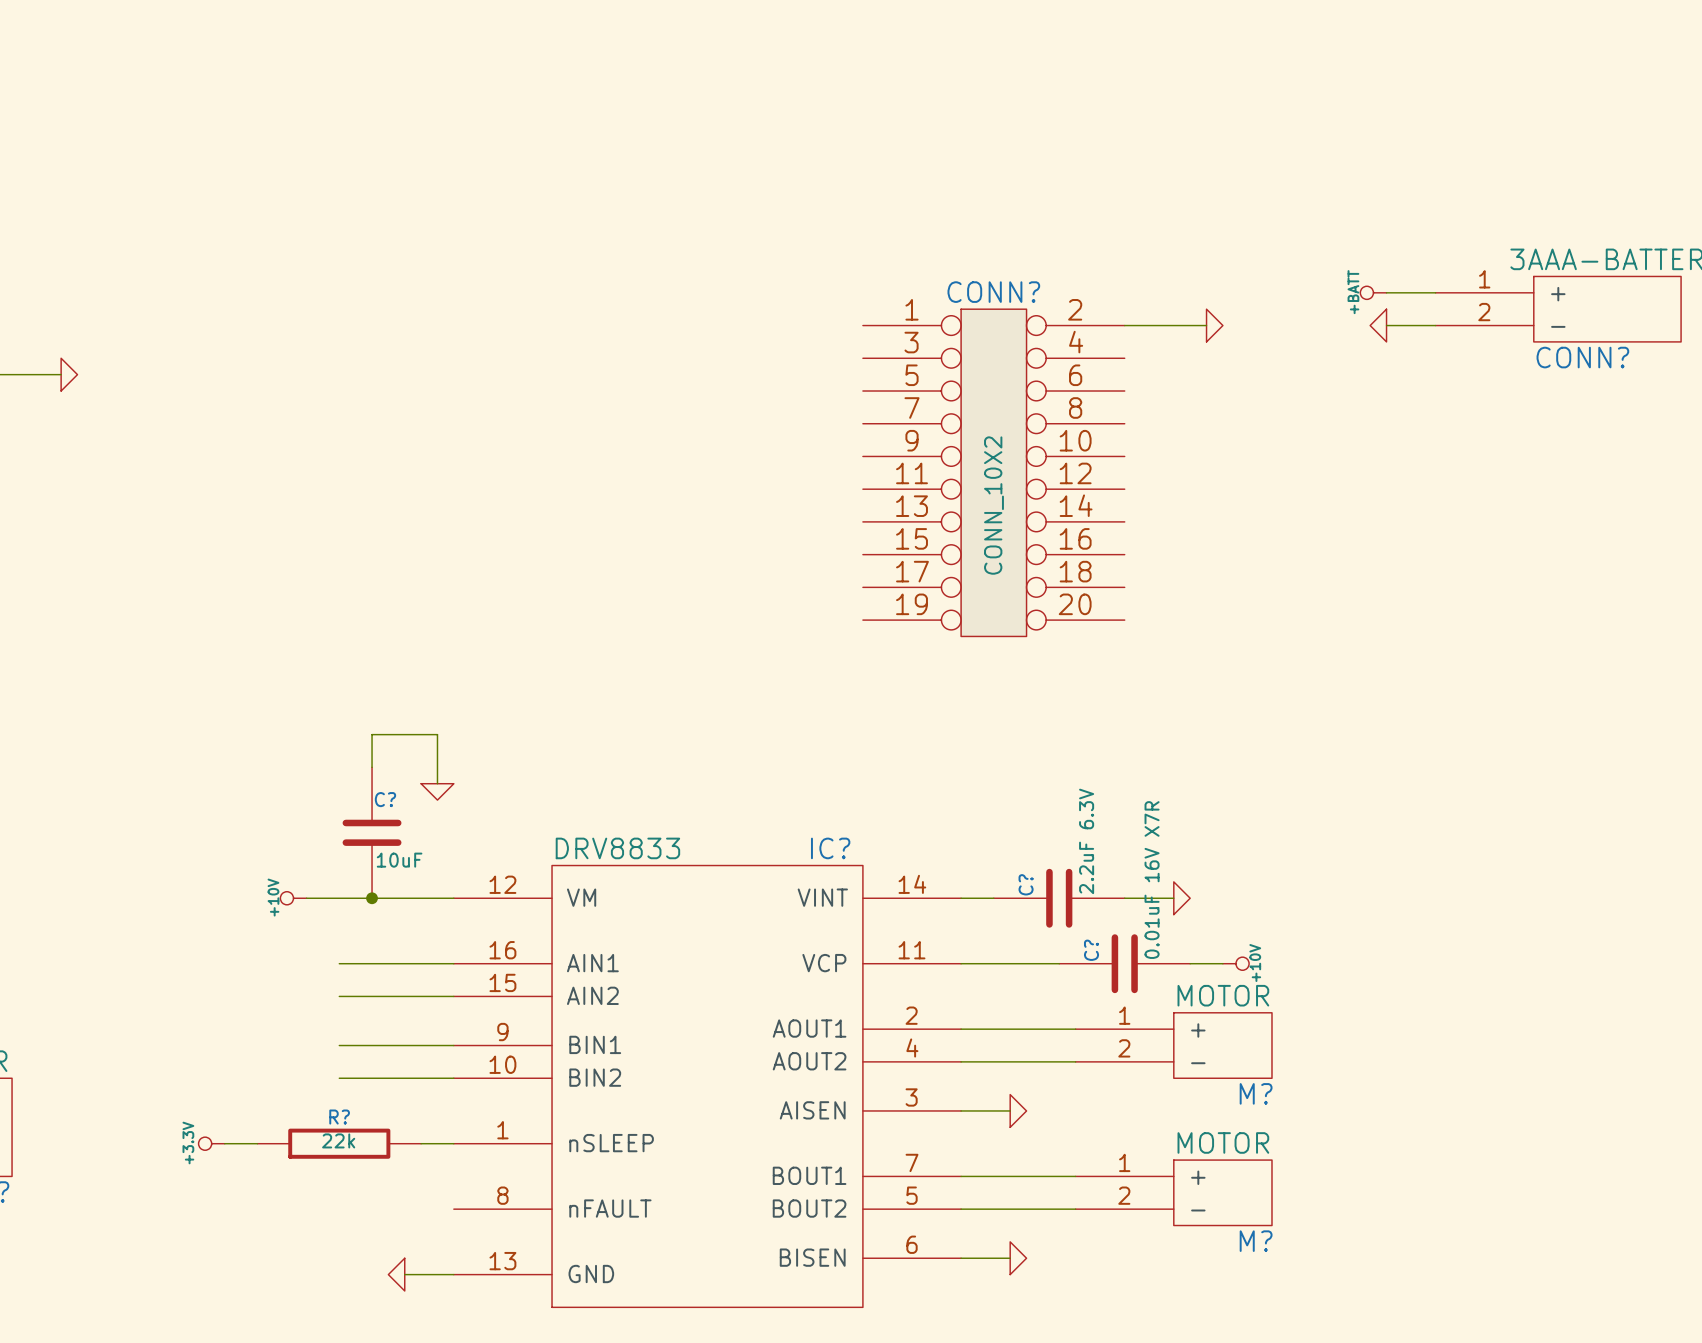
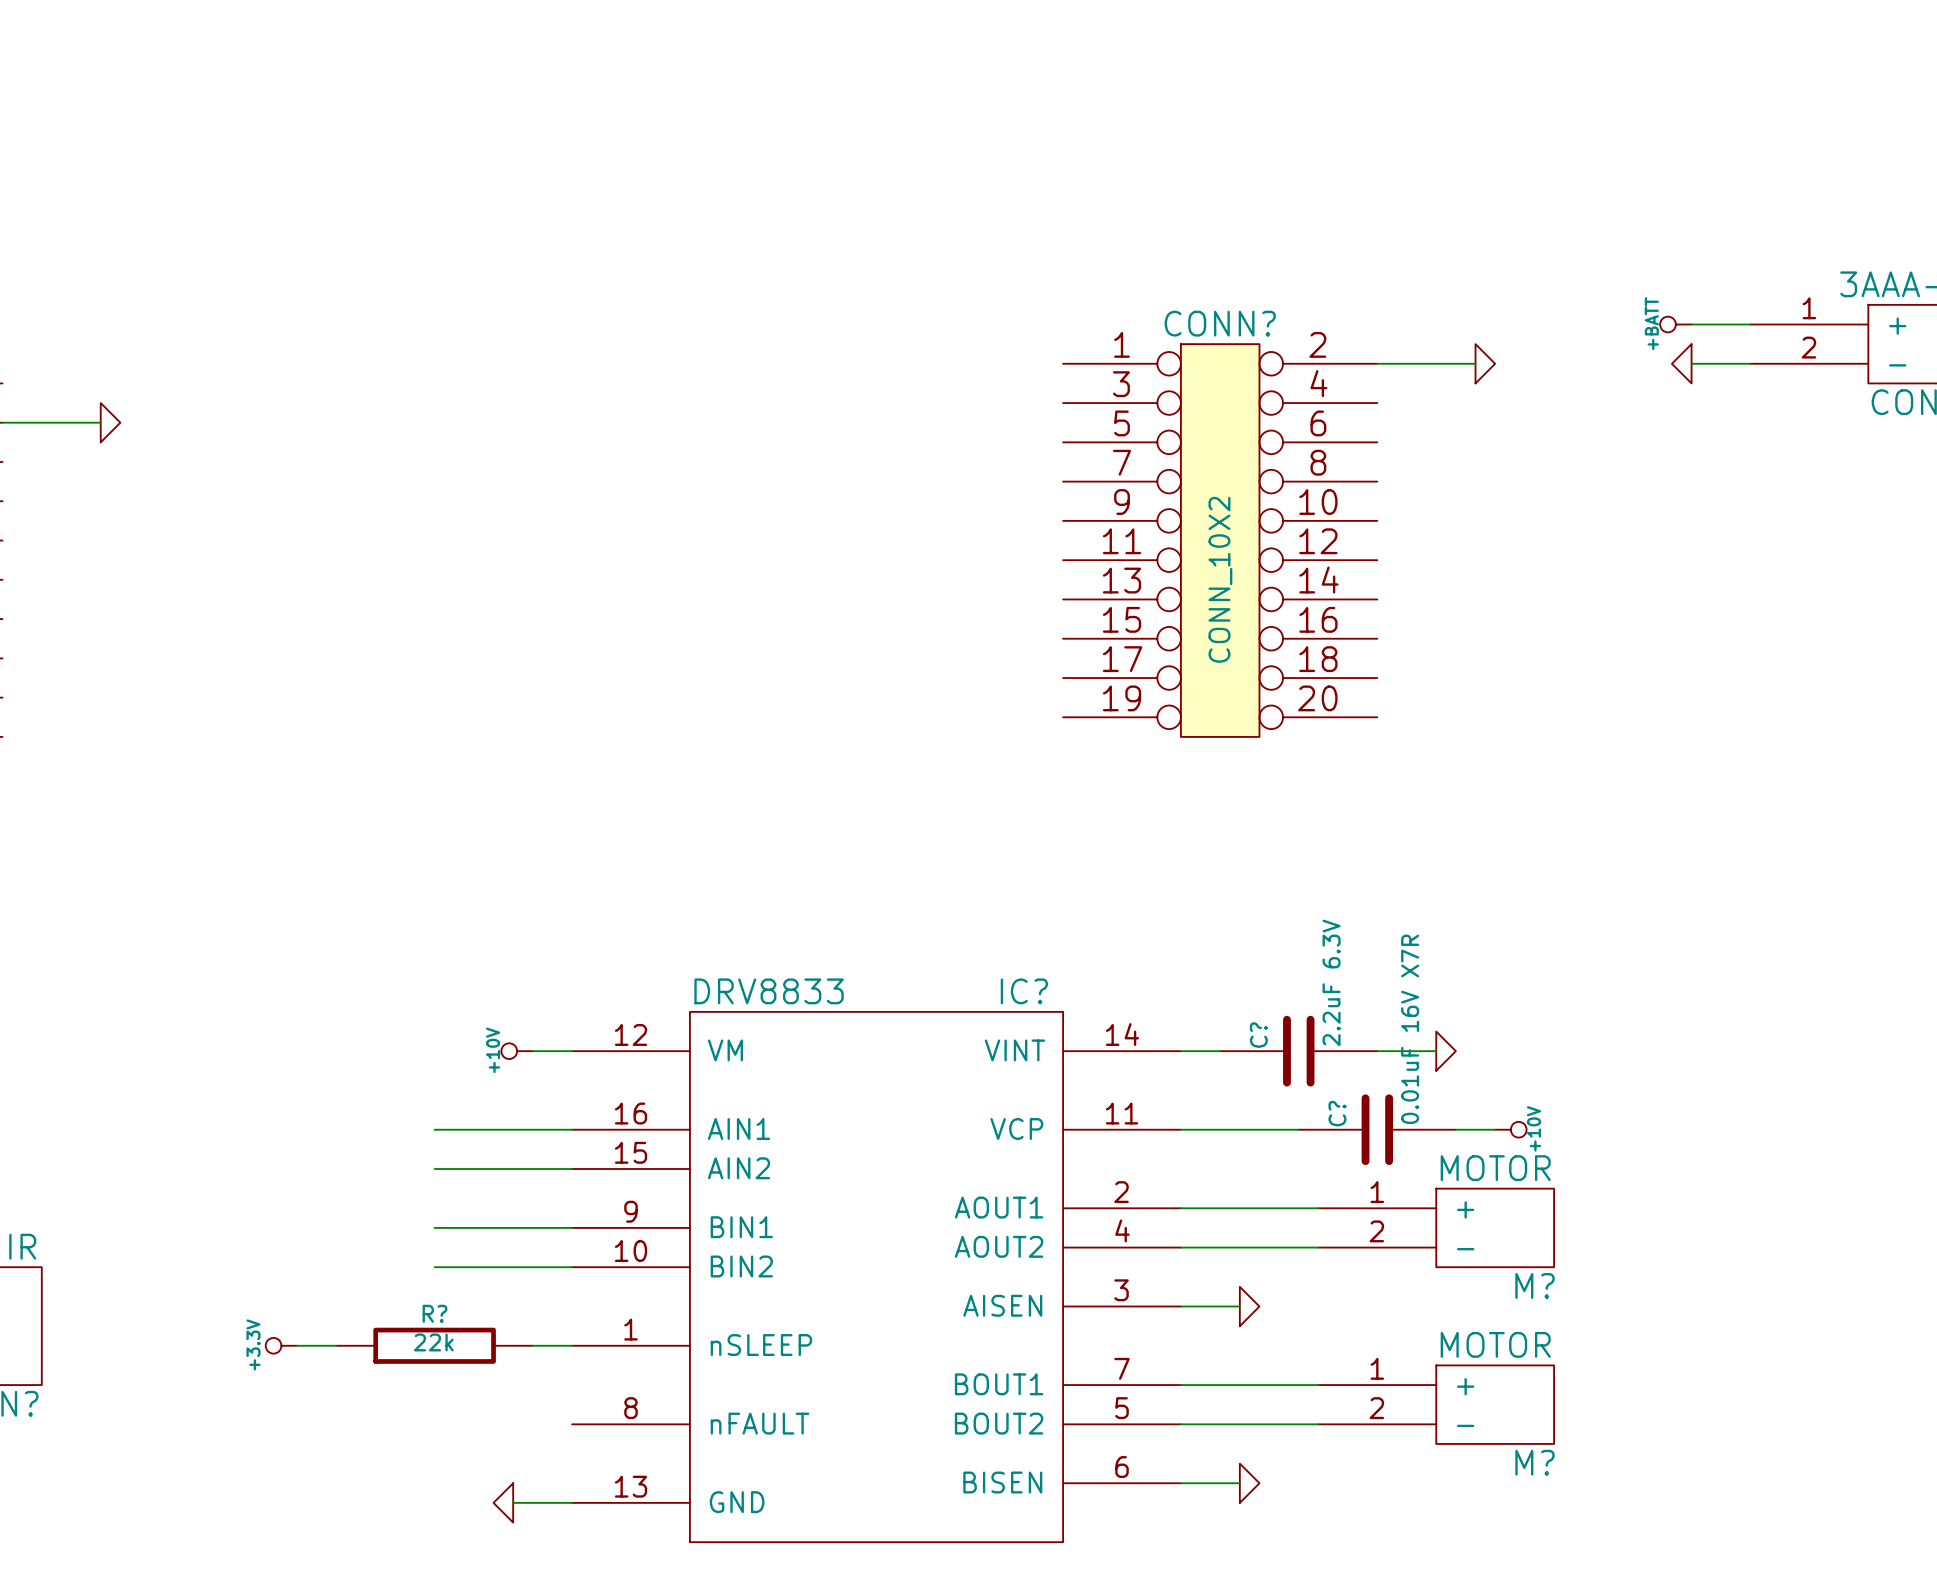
wire: (372, 767) (372, 734) (437, 734) (437, 783) -> none
power symbol: (437, 791) -> none
C?: 10uF (372, 832) -> none
power symbol position: +10V (293, 898) -> +10V (517, 1051)
wire: (306, 898) (421, 898) -> none
junction: (372, 898) -> none

